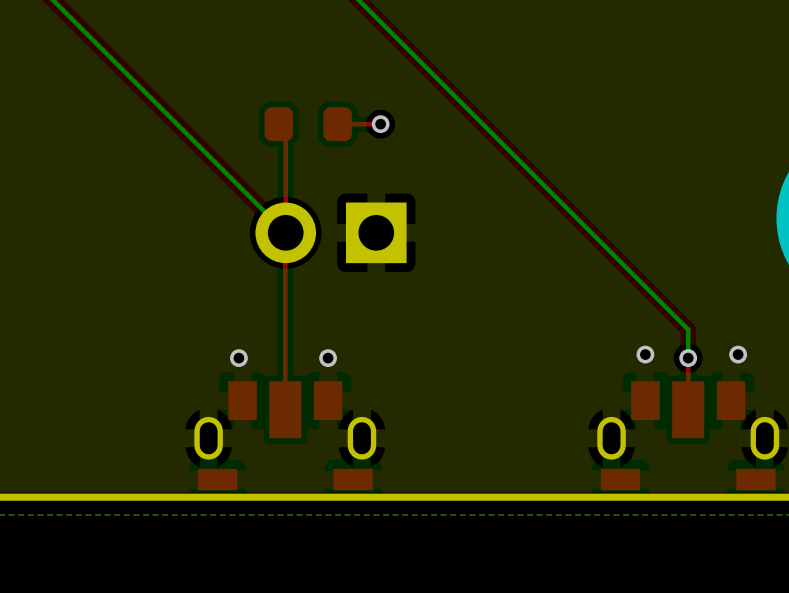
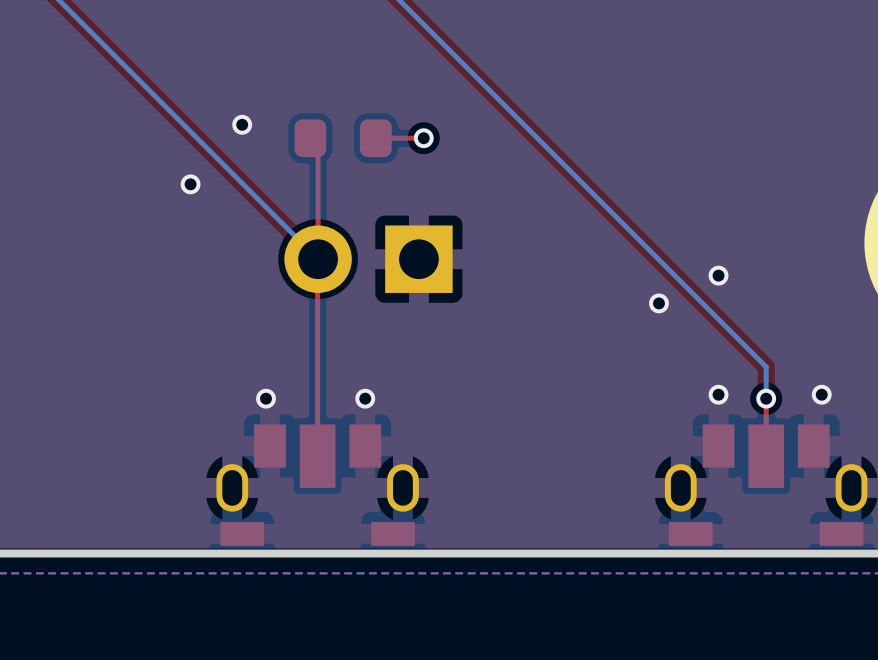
via: none -> (242, 124)
via: none -> (190, 184)
via: none -> (718, 275)
via: none -> (658, 303)

